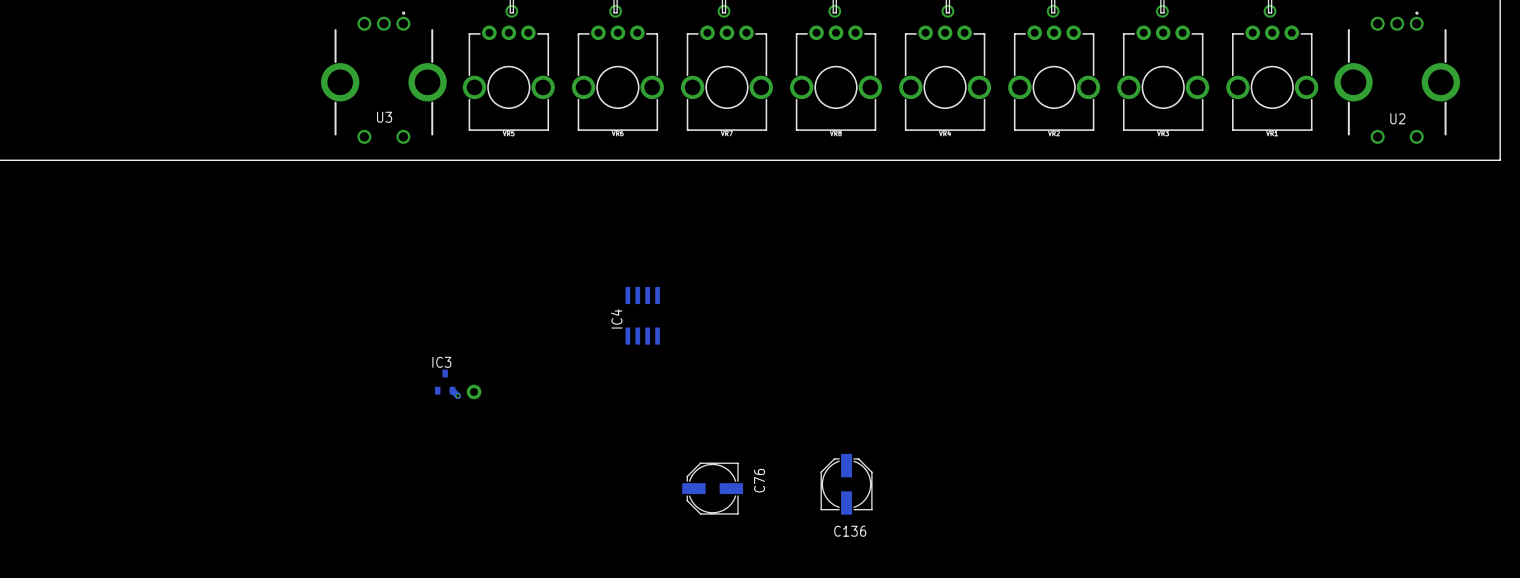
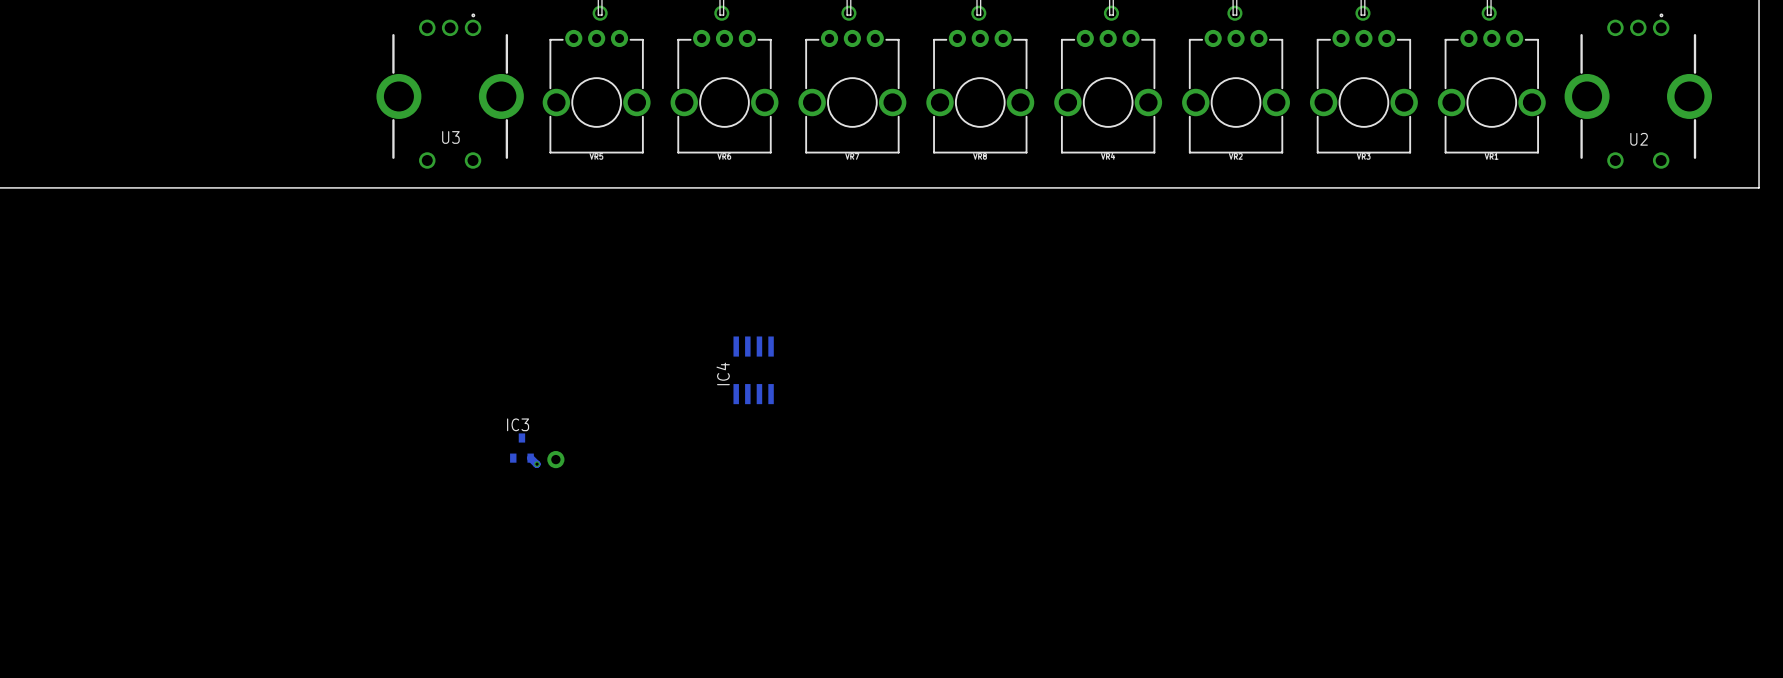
C136: (846, 484) -> none
C76: (712, 488) -> none

